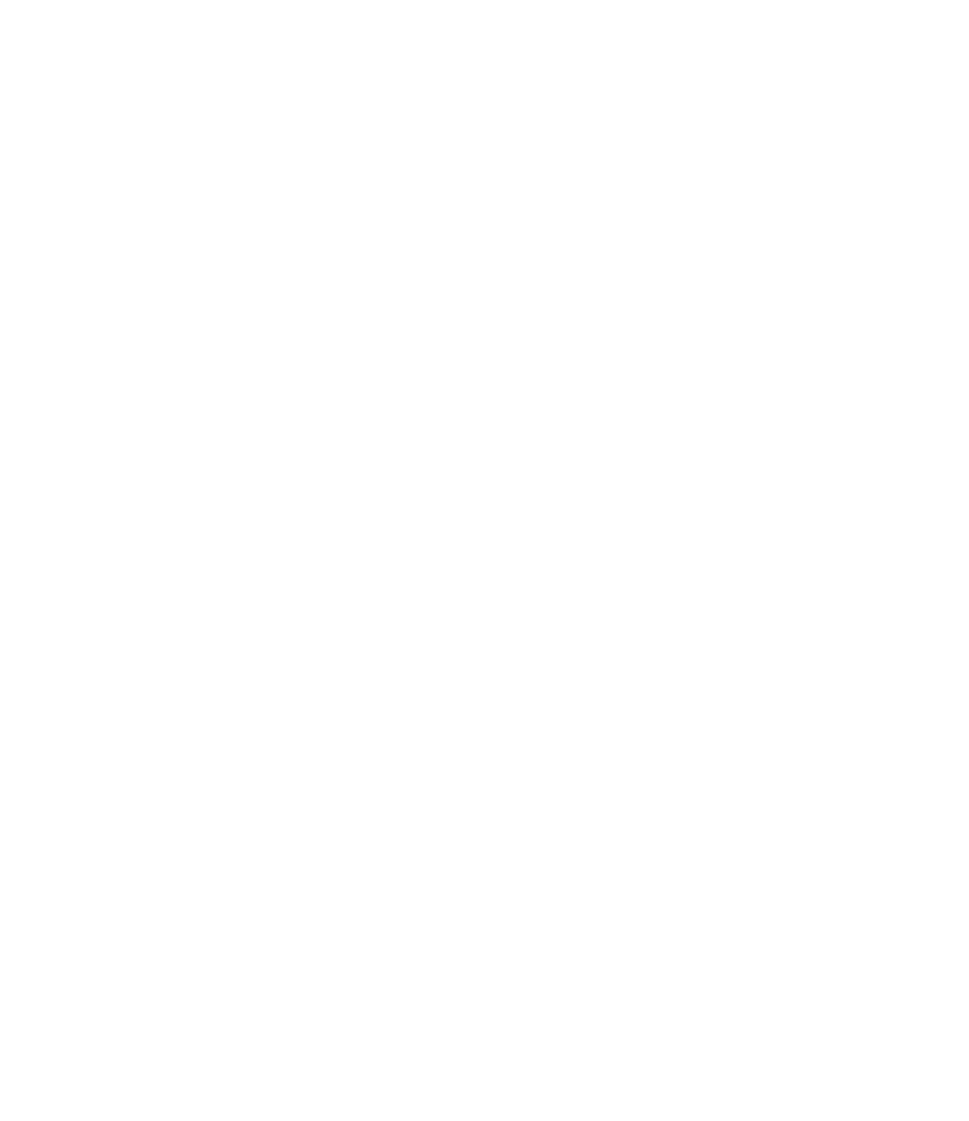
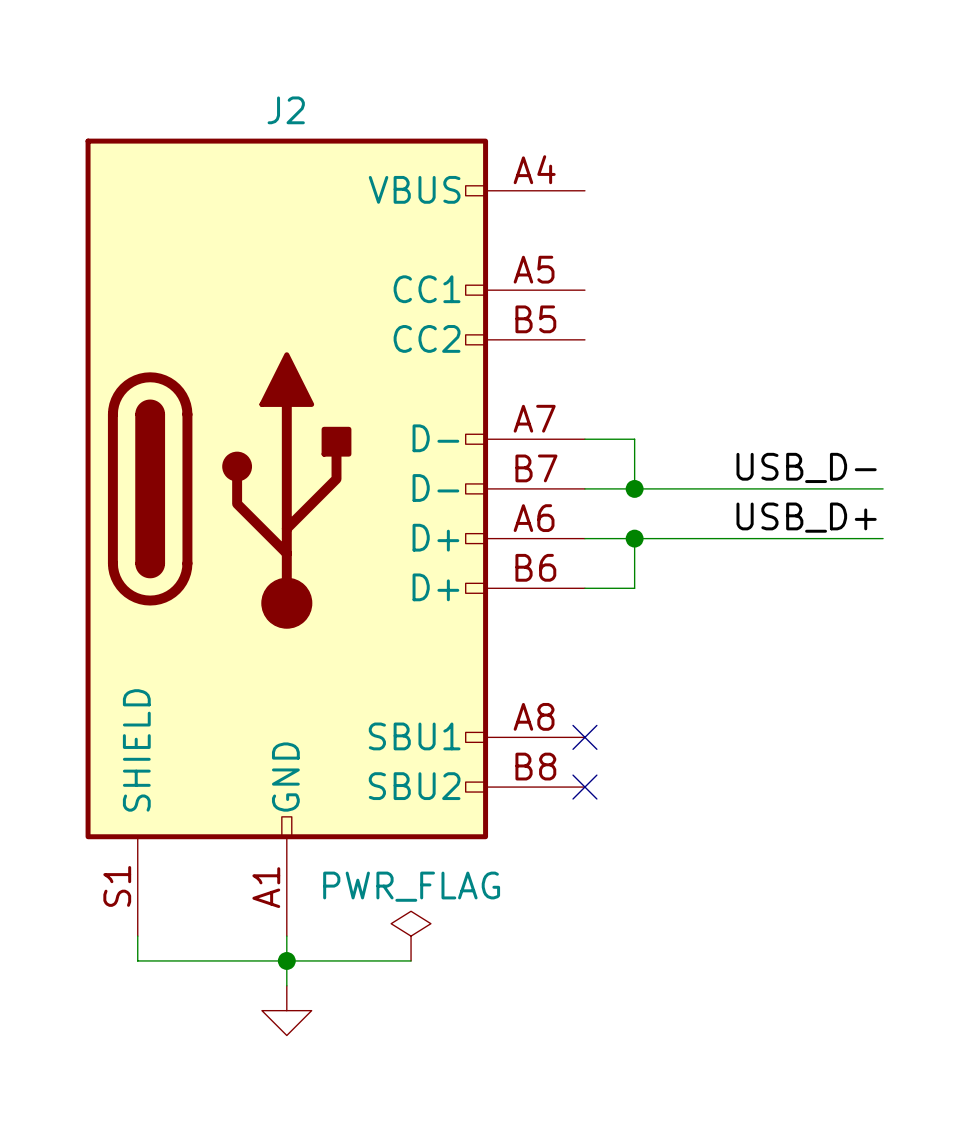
wire: none -> (584, 439) (634, 439) (634, 488)
label: none -> USB_D- (806, 467)
wire: none -> (584, 488) (883, 488)
junction: none -> (634, 488)
label: none -> USB_D+ (806, 517)
J2: none -> (335, 537)
wire: none -> (584, 538) (883, 538)
wire: none -> (634, 538) (634, 588) (584, 588)
junction: none -> (634, 538)
no-connect mark: none -> (584, 737)
no-connect mark: none -> (584, 787)
wire: none -> (137, 936) (137, 960) (411, 960)
wire: none -> (286, 936) (286, 985)
power symbol: none -> PWR_FLAG (411, 936)
junction: none -> (286, 960)
power symbol: none -> (286, 1010)

